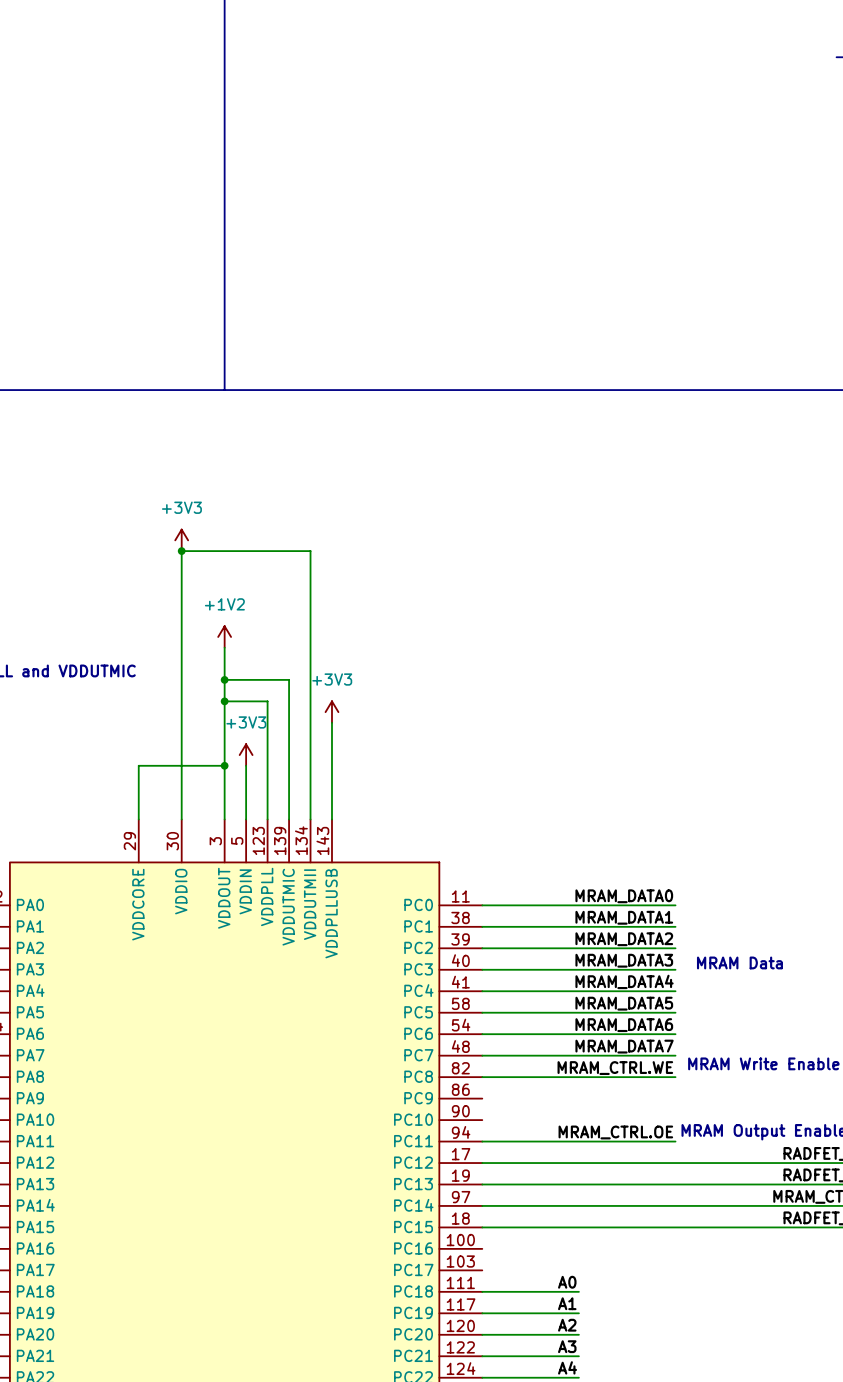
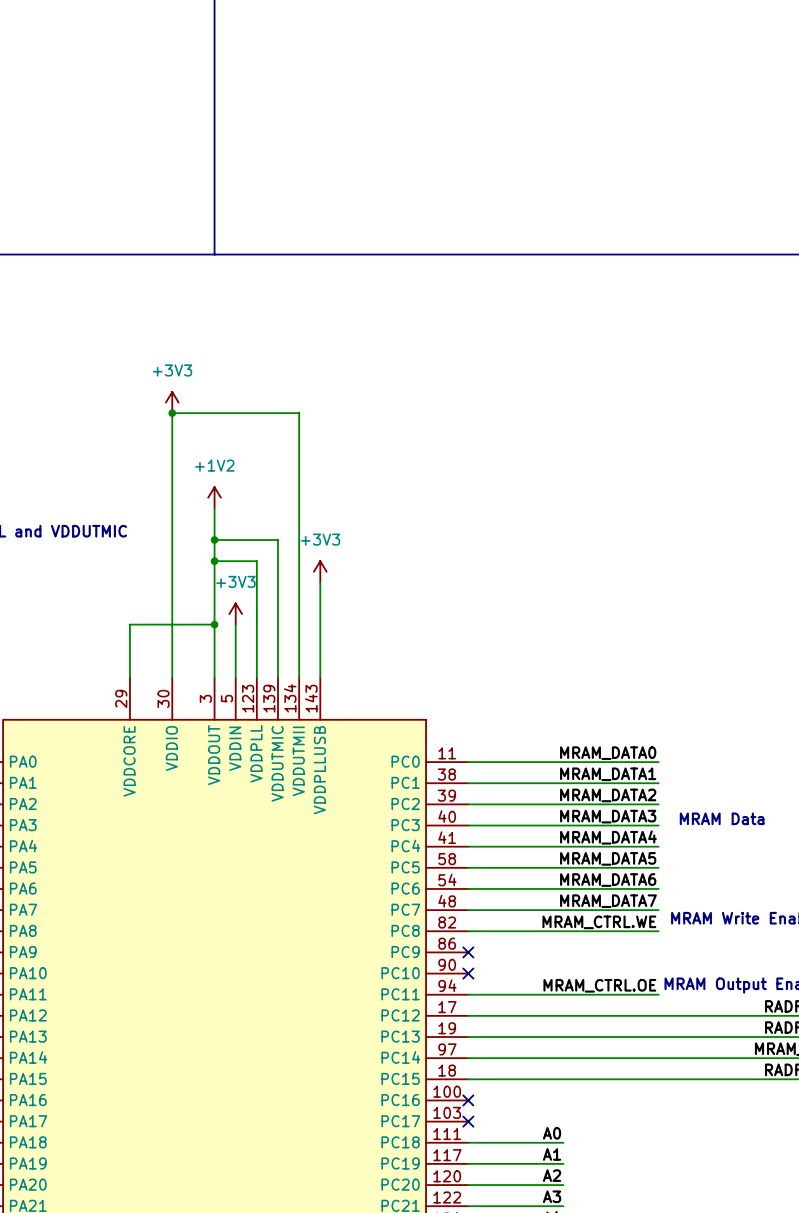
no-connect mark: none -> (468, 952)
no-connect mark: none -> (468, 973)
no-connect mark: none -> (468, 1100)
no-connect mark: none -> (468, 1121)

